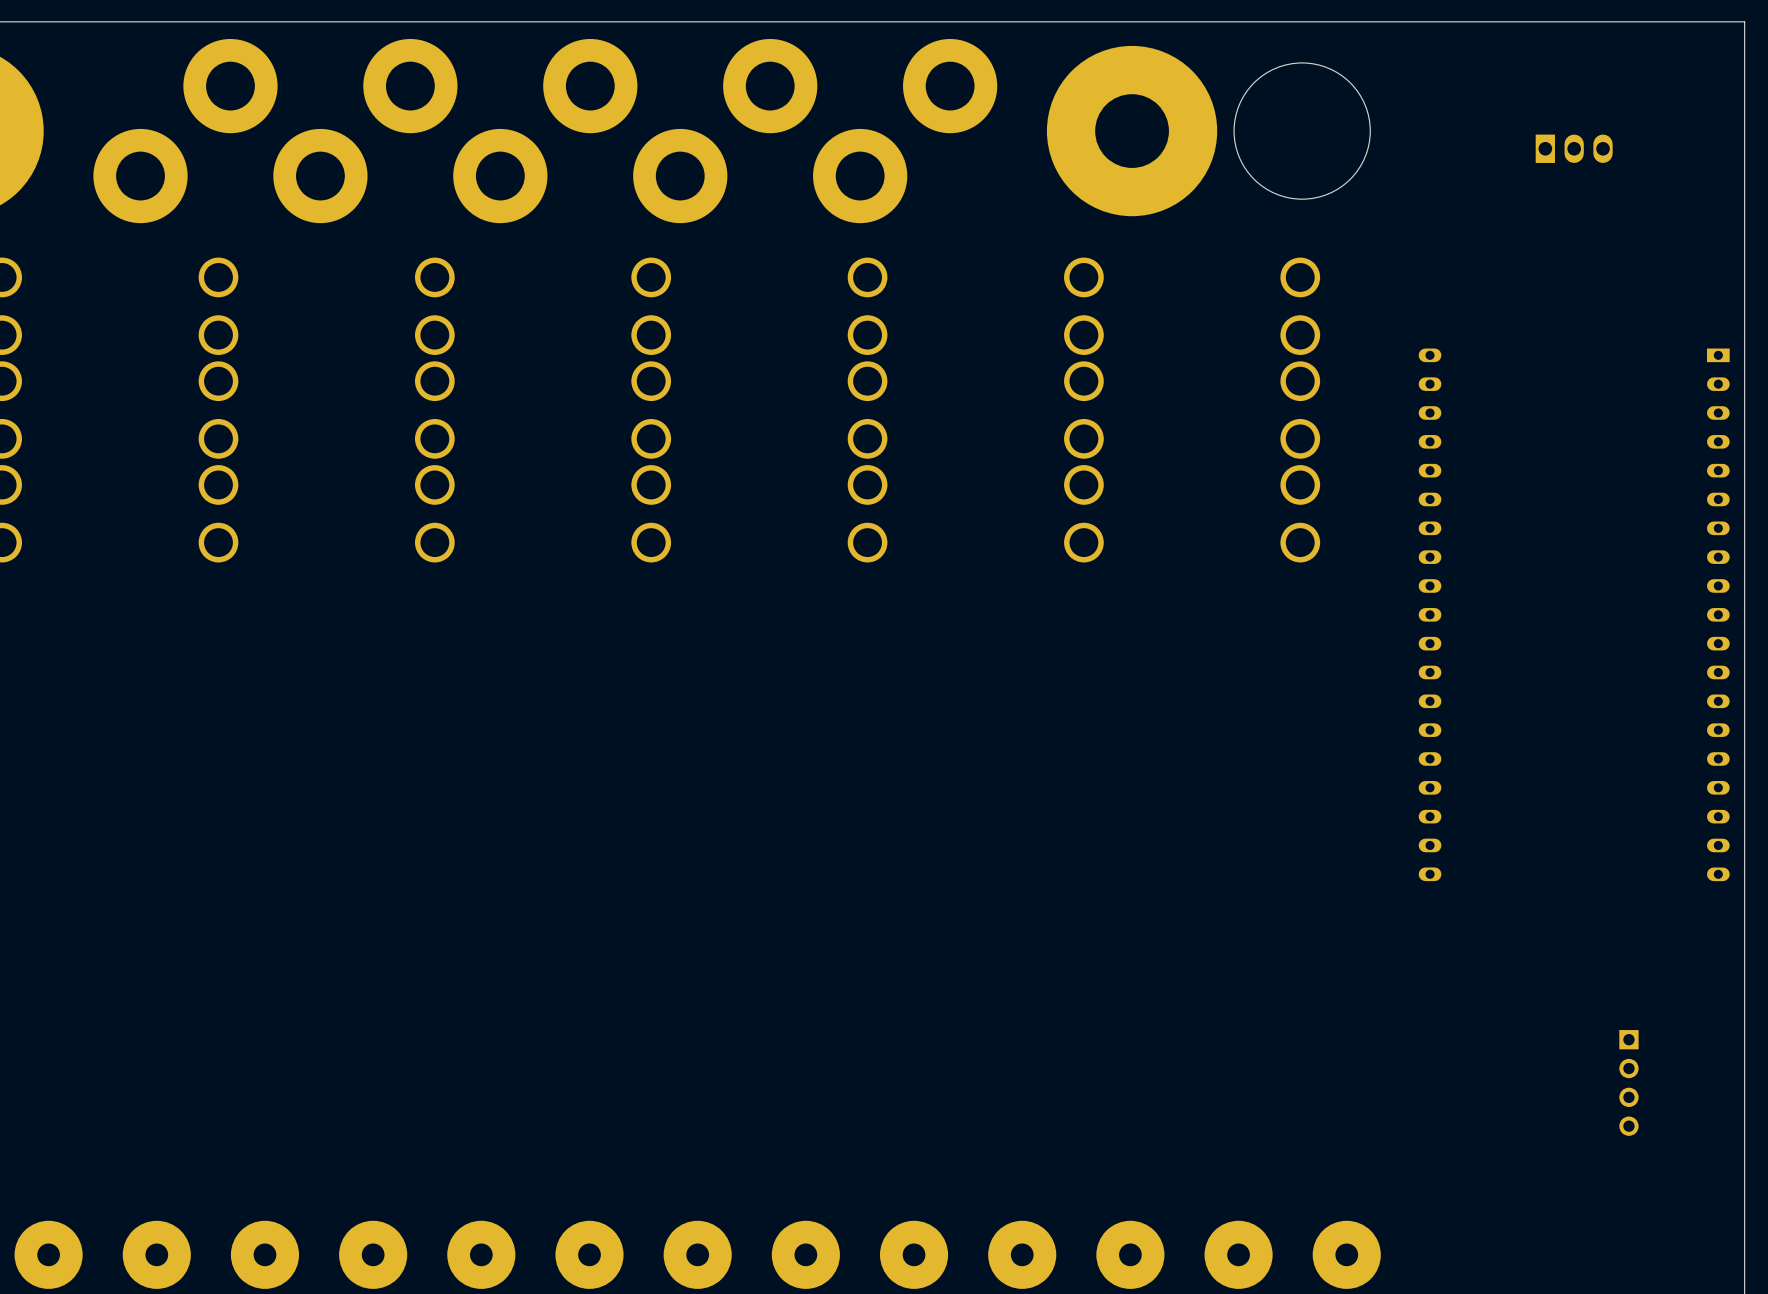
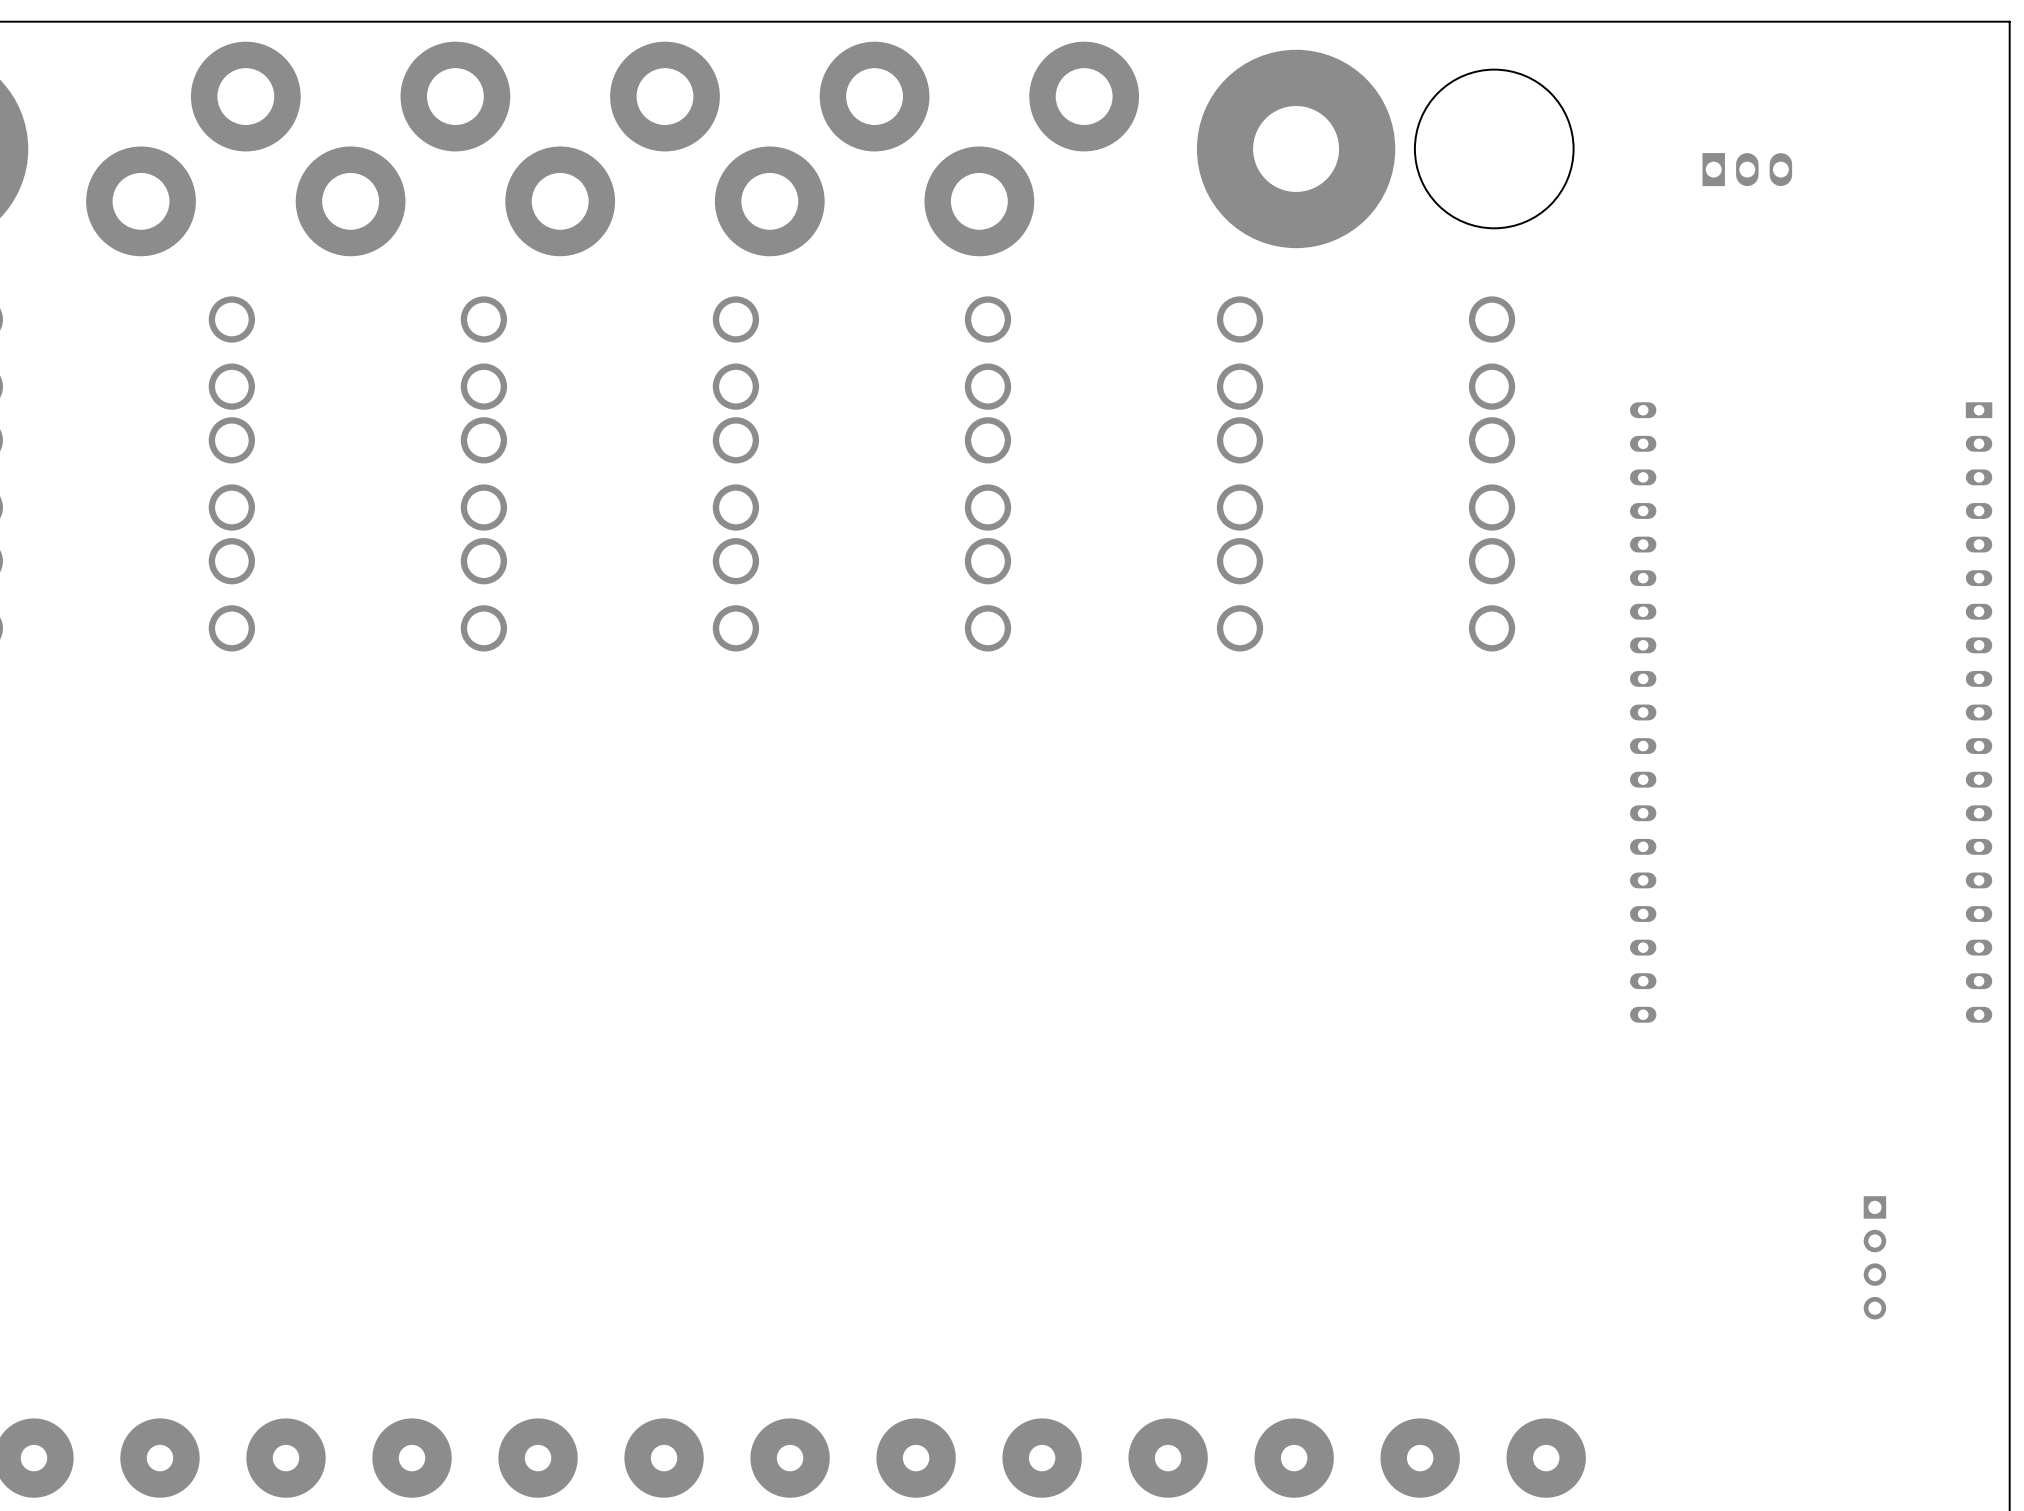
part position: (1574, 148) -> (1747, 169)

